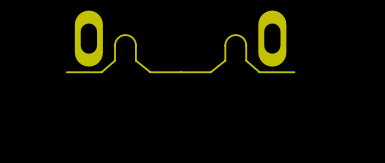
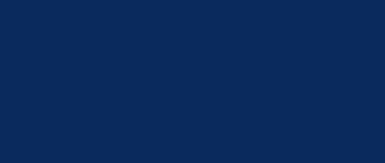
part: (180, 41) -> none

